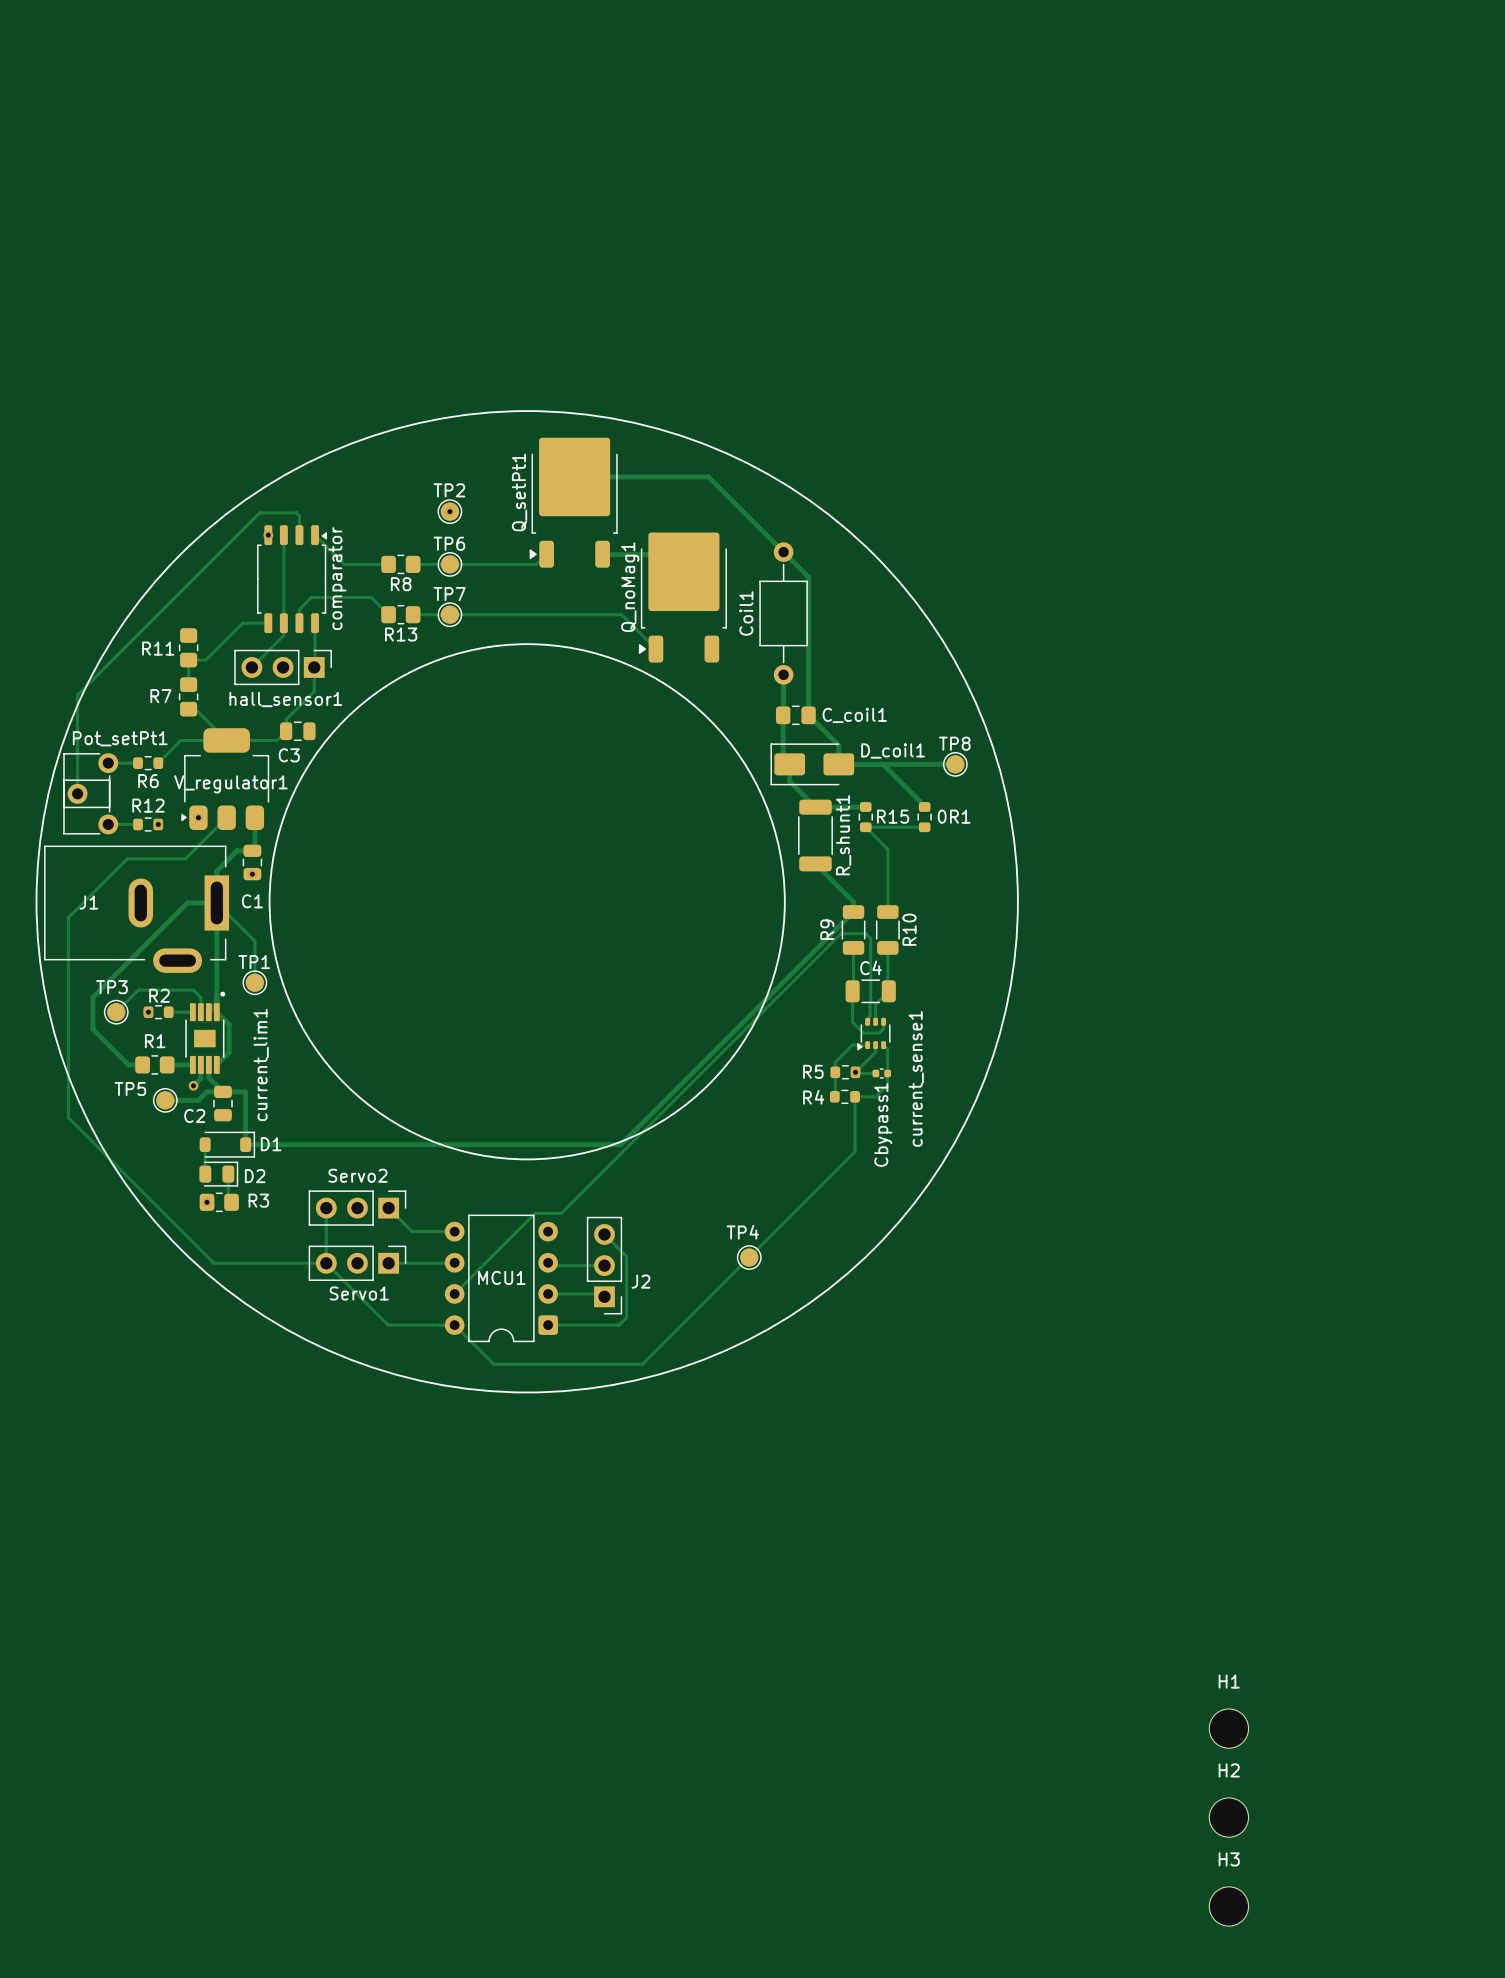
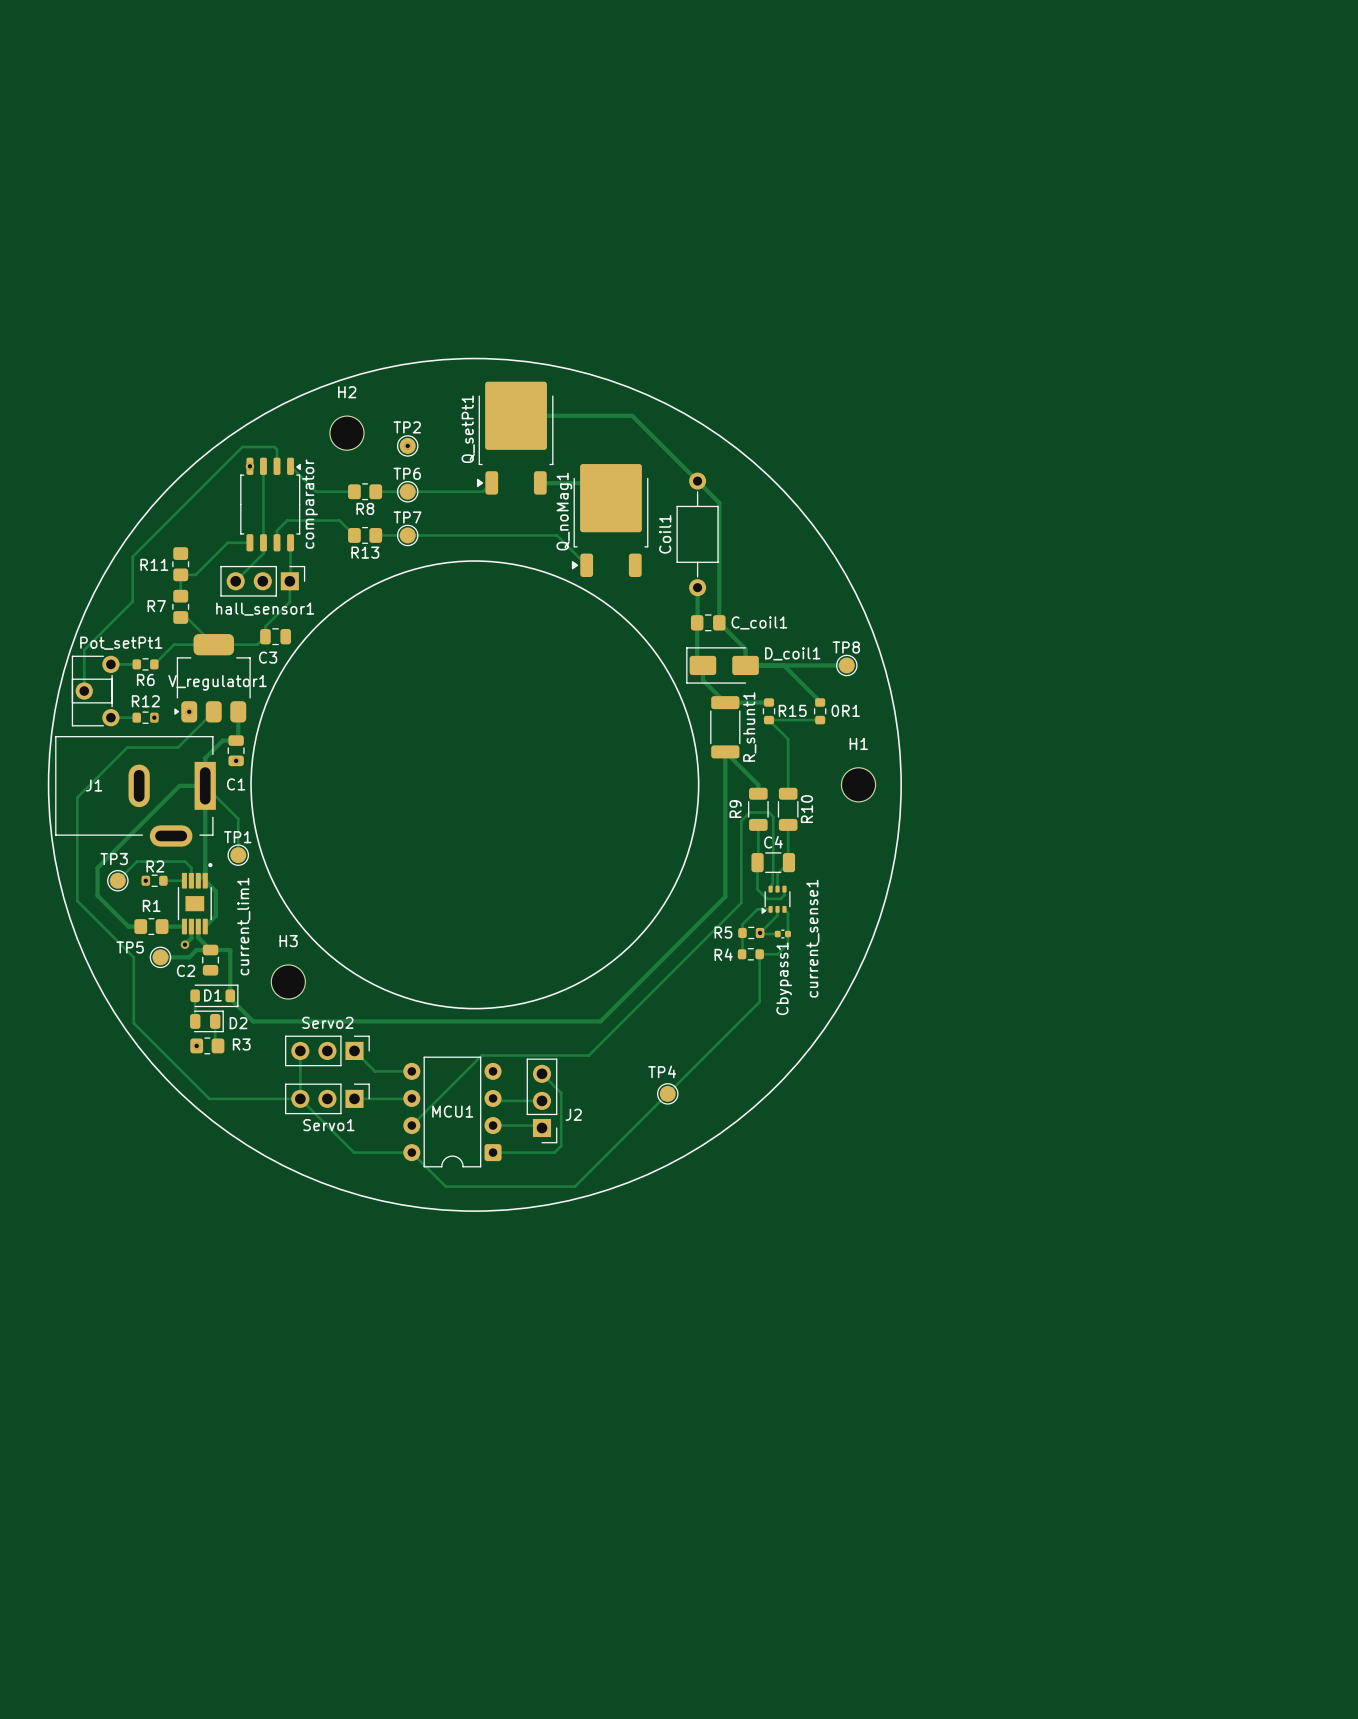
track: (133, 639) (77, 695) (77, 746) -> (132, 556) (132, 601) (84, 650)
track: (853, 912) (620, 1144) (245, 1144) -> (725, 751) (725, 896) (600, 1021) (253, 1021) (230, 998) (230, 995)
track: (69, 916) (68, 1117) (214, 1263) (221, 1263) -> (77, 797) (77, 900) (133, 957) (133, 1023) (209, 1098)
track: (843, 933) (841, 933) (561, 1213) -> (749, 812) (741, 821) (741, 903) (588, 1055) (504, 1055)
D1 name position: D1 (271, 1144) -> D1 (212, 995)
H1 position: (1228, 1728) -> (858, 784)
H2 position: (1228, 1817) -> (346, 433)
H3 position: (1228, 1906) -> (288, 981)

